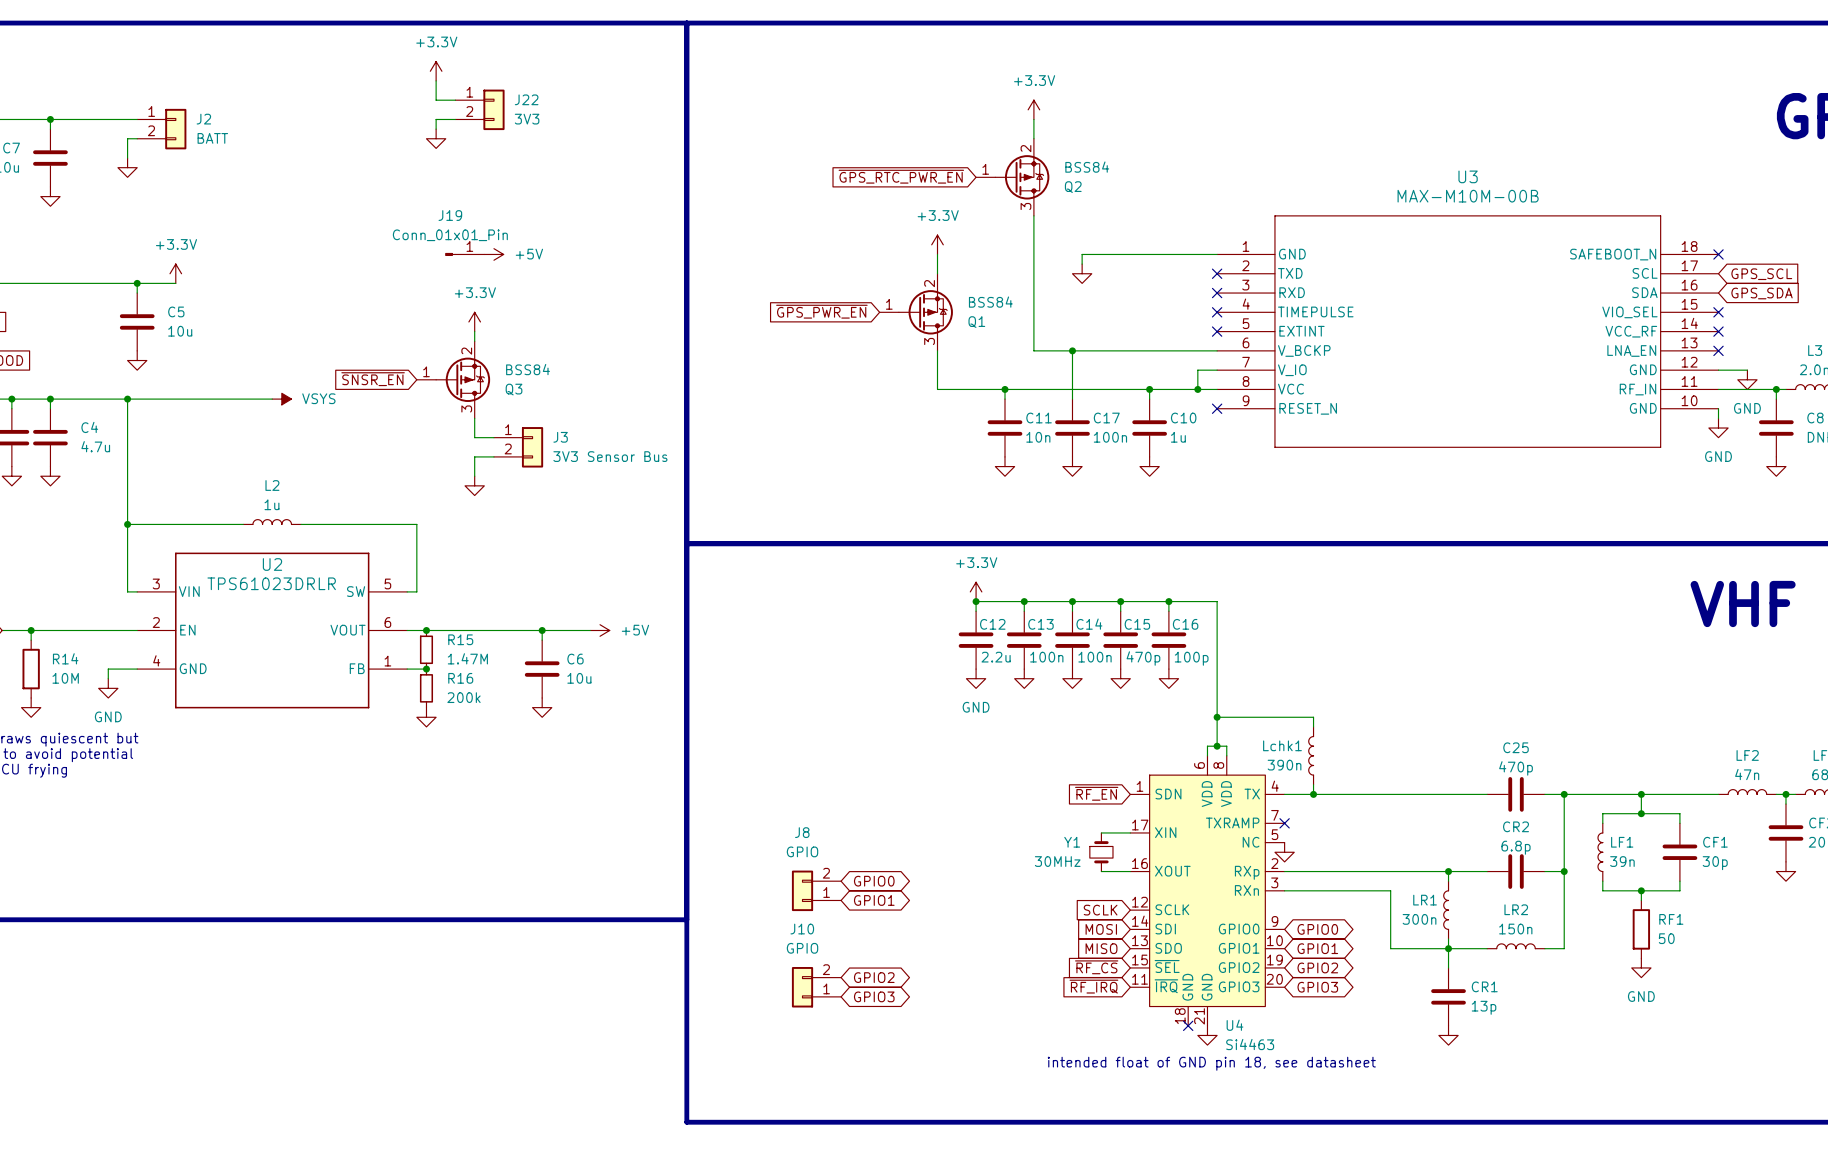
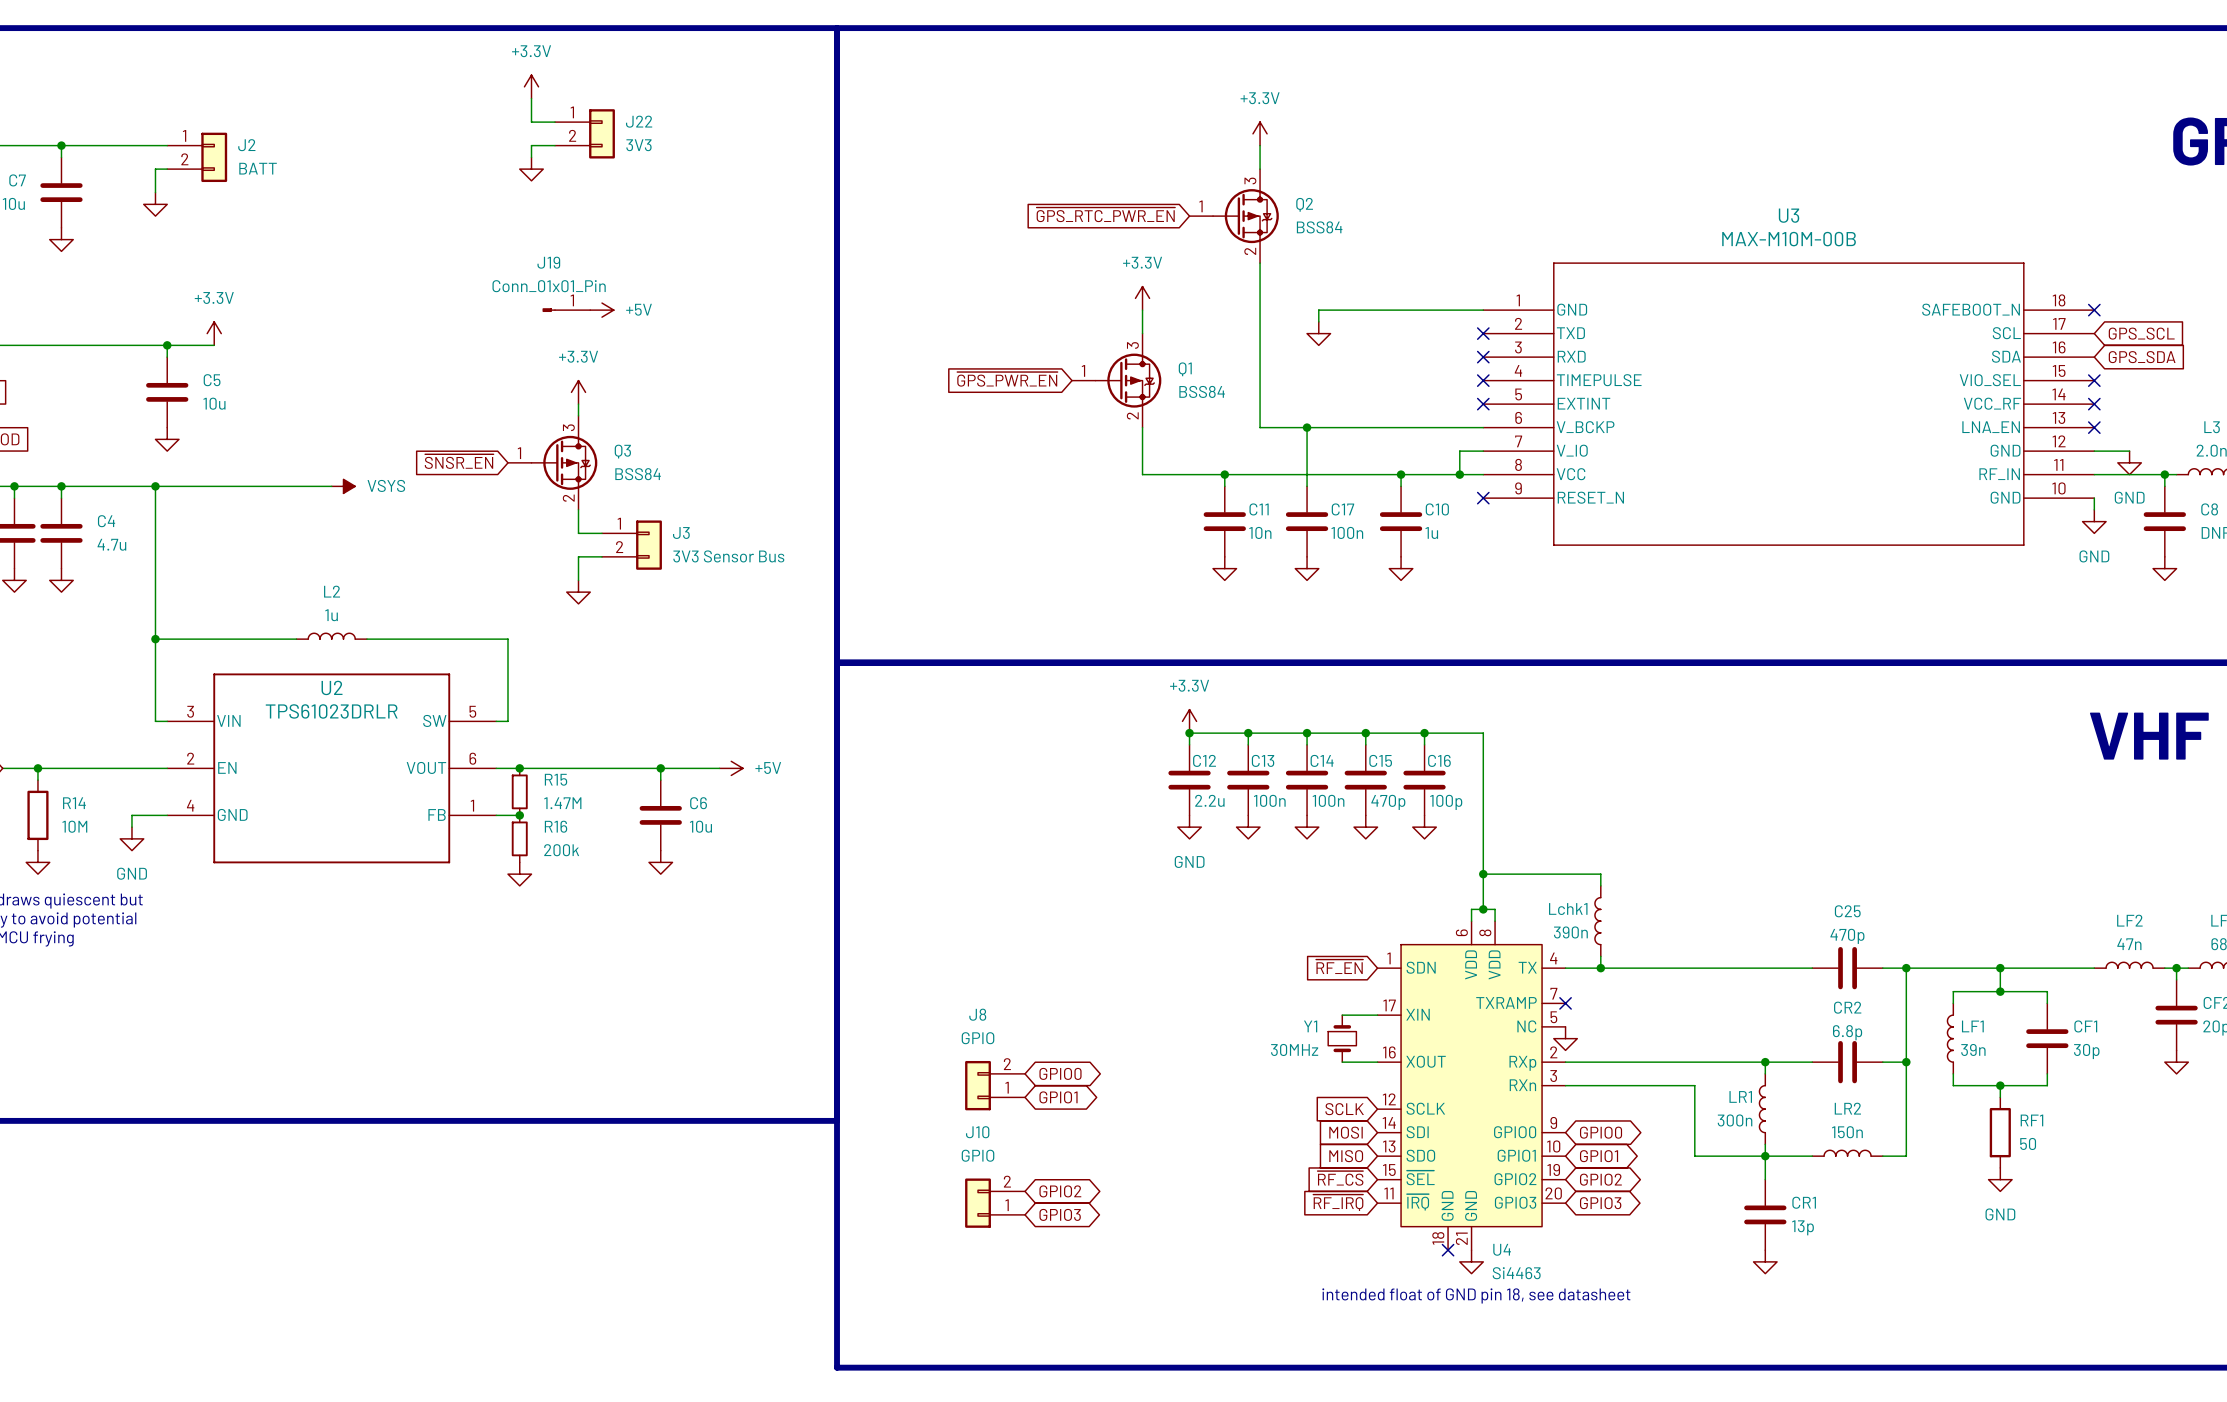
Q2 flip: as is (1022, 177) -> up-down (1245, 216)
Q1 flip: as is (925, 312) -> up-down (1128, 380)
Q3 flip: as is (463, 379) -> up-down (564, 462)

